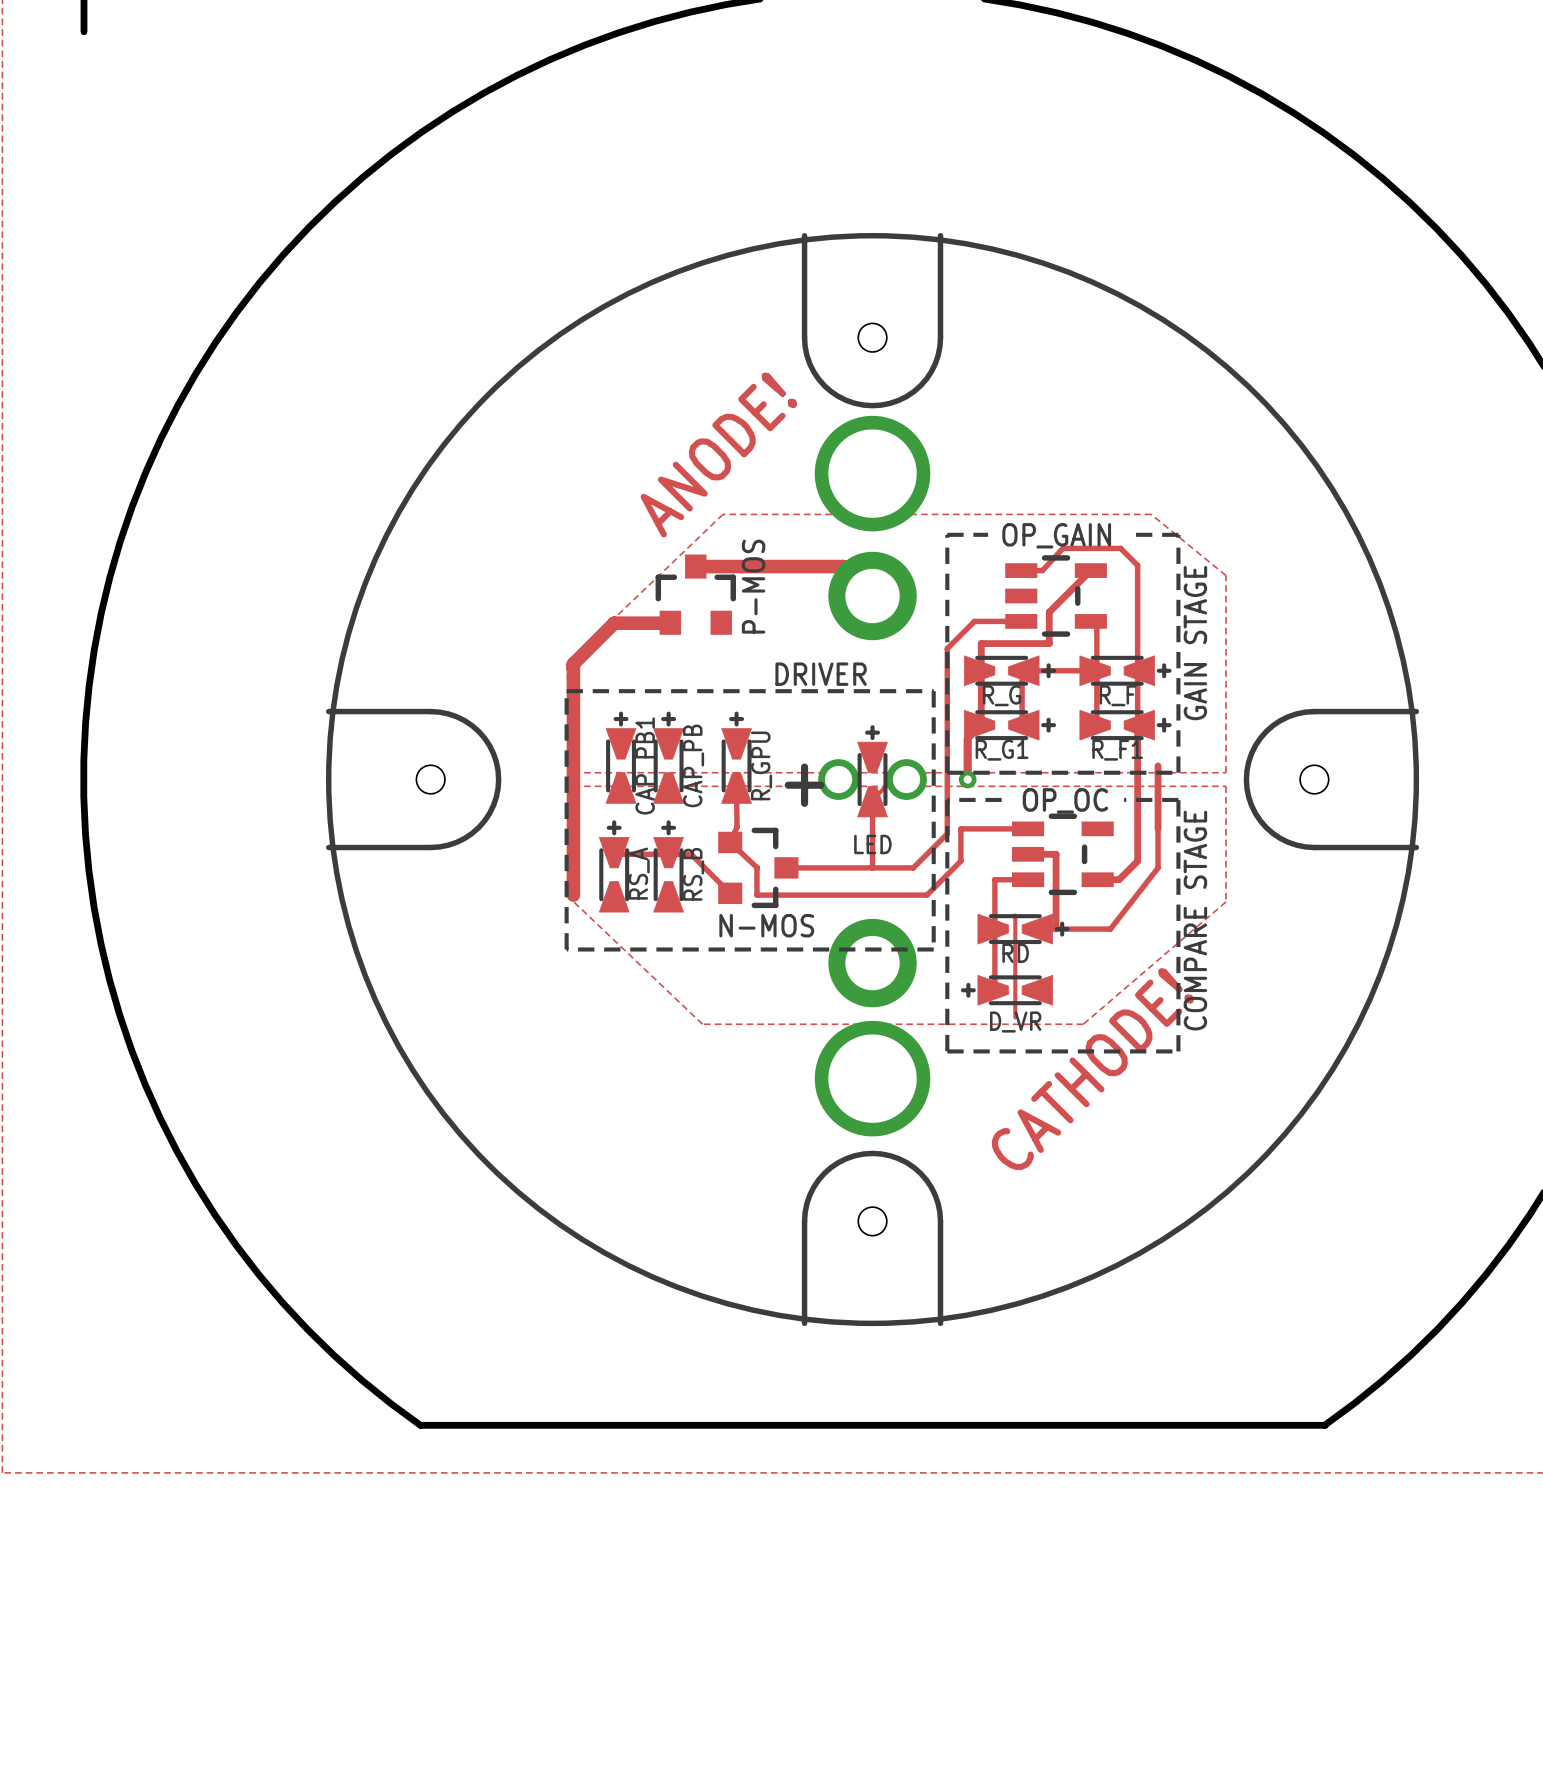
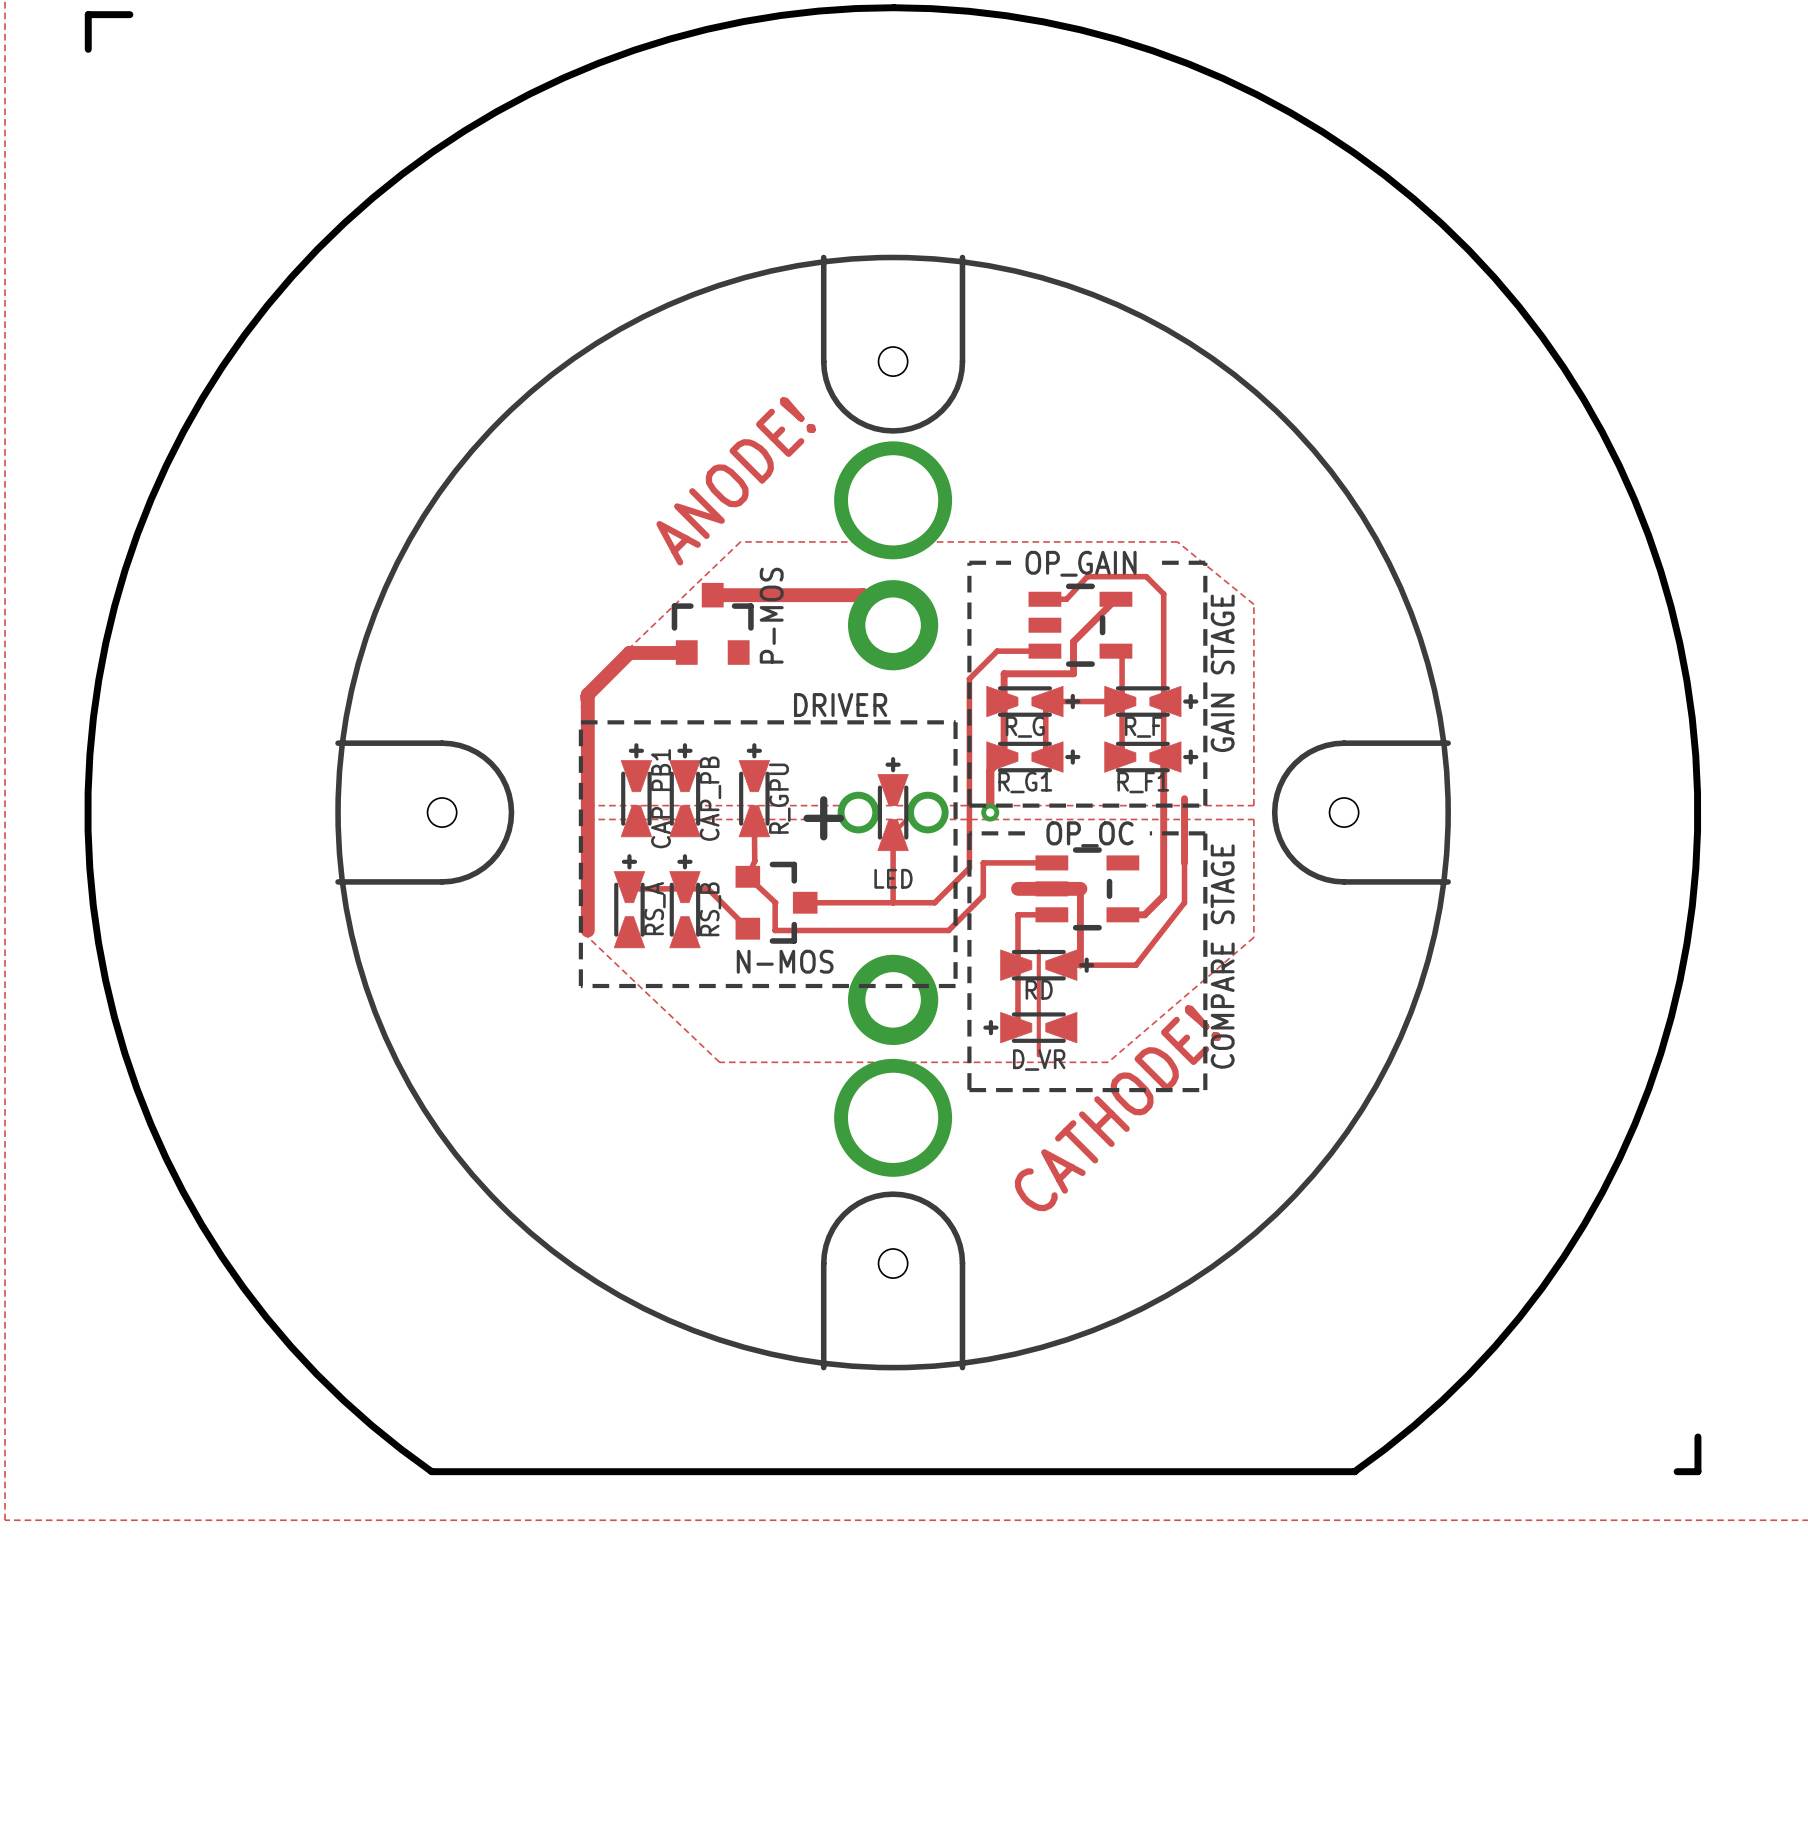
track: none -> (1017, 888) (1080, 888)

